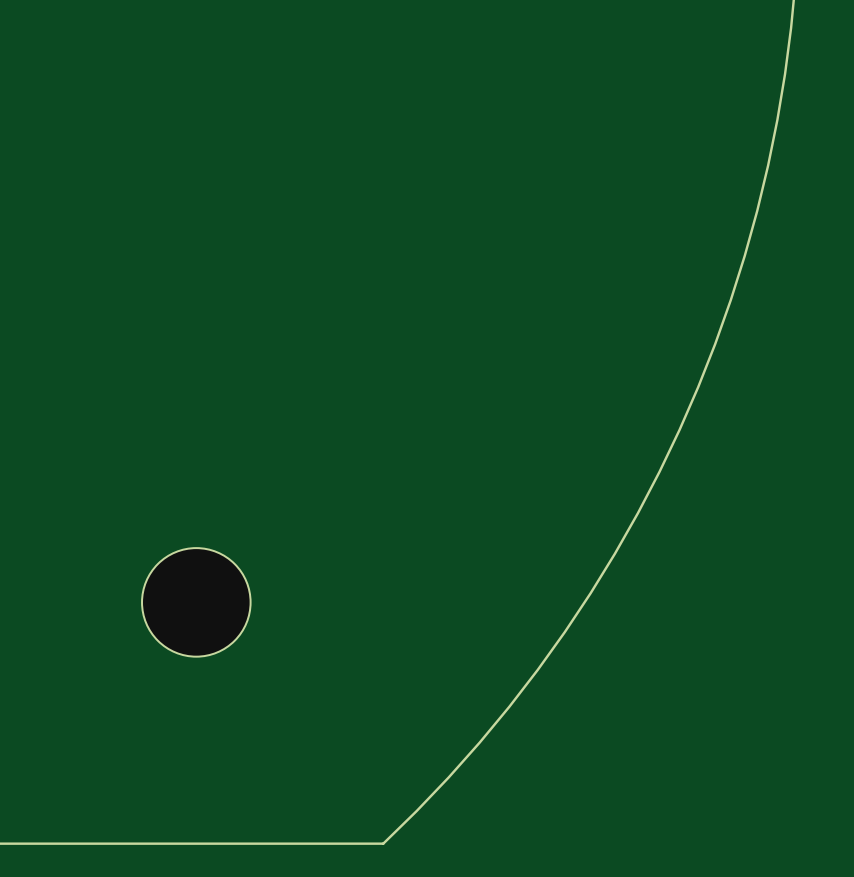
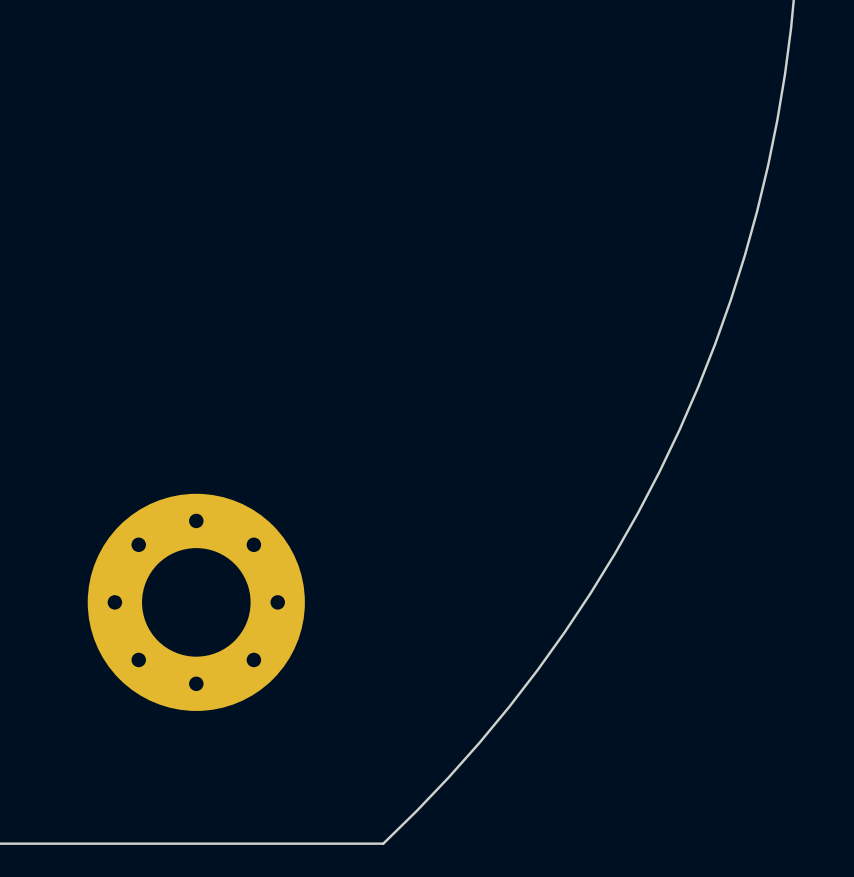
part footprint: [142, 548, 251, 657] -> [87, 493, 305, 711]

